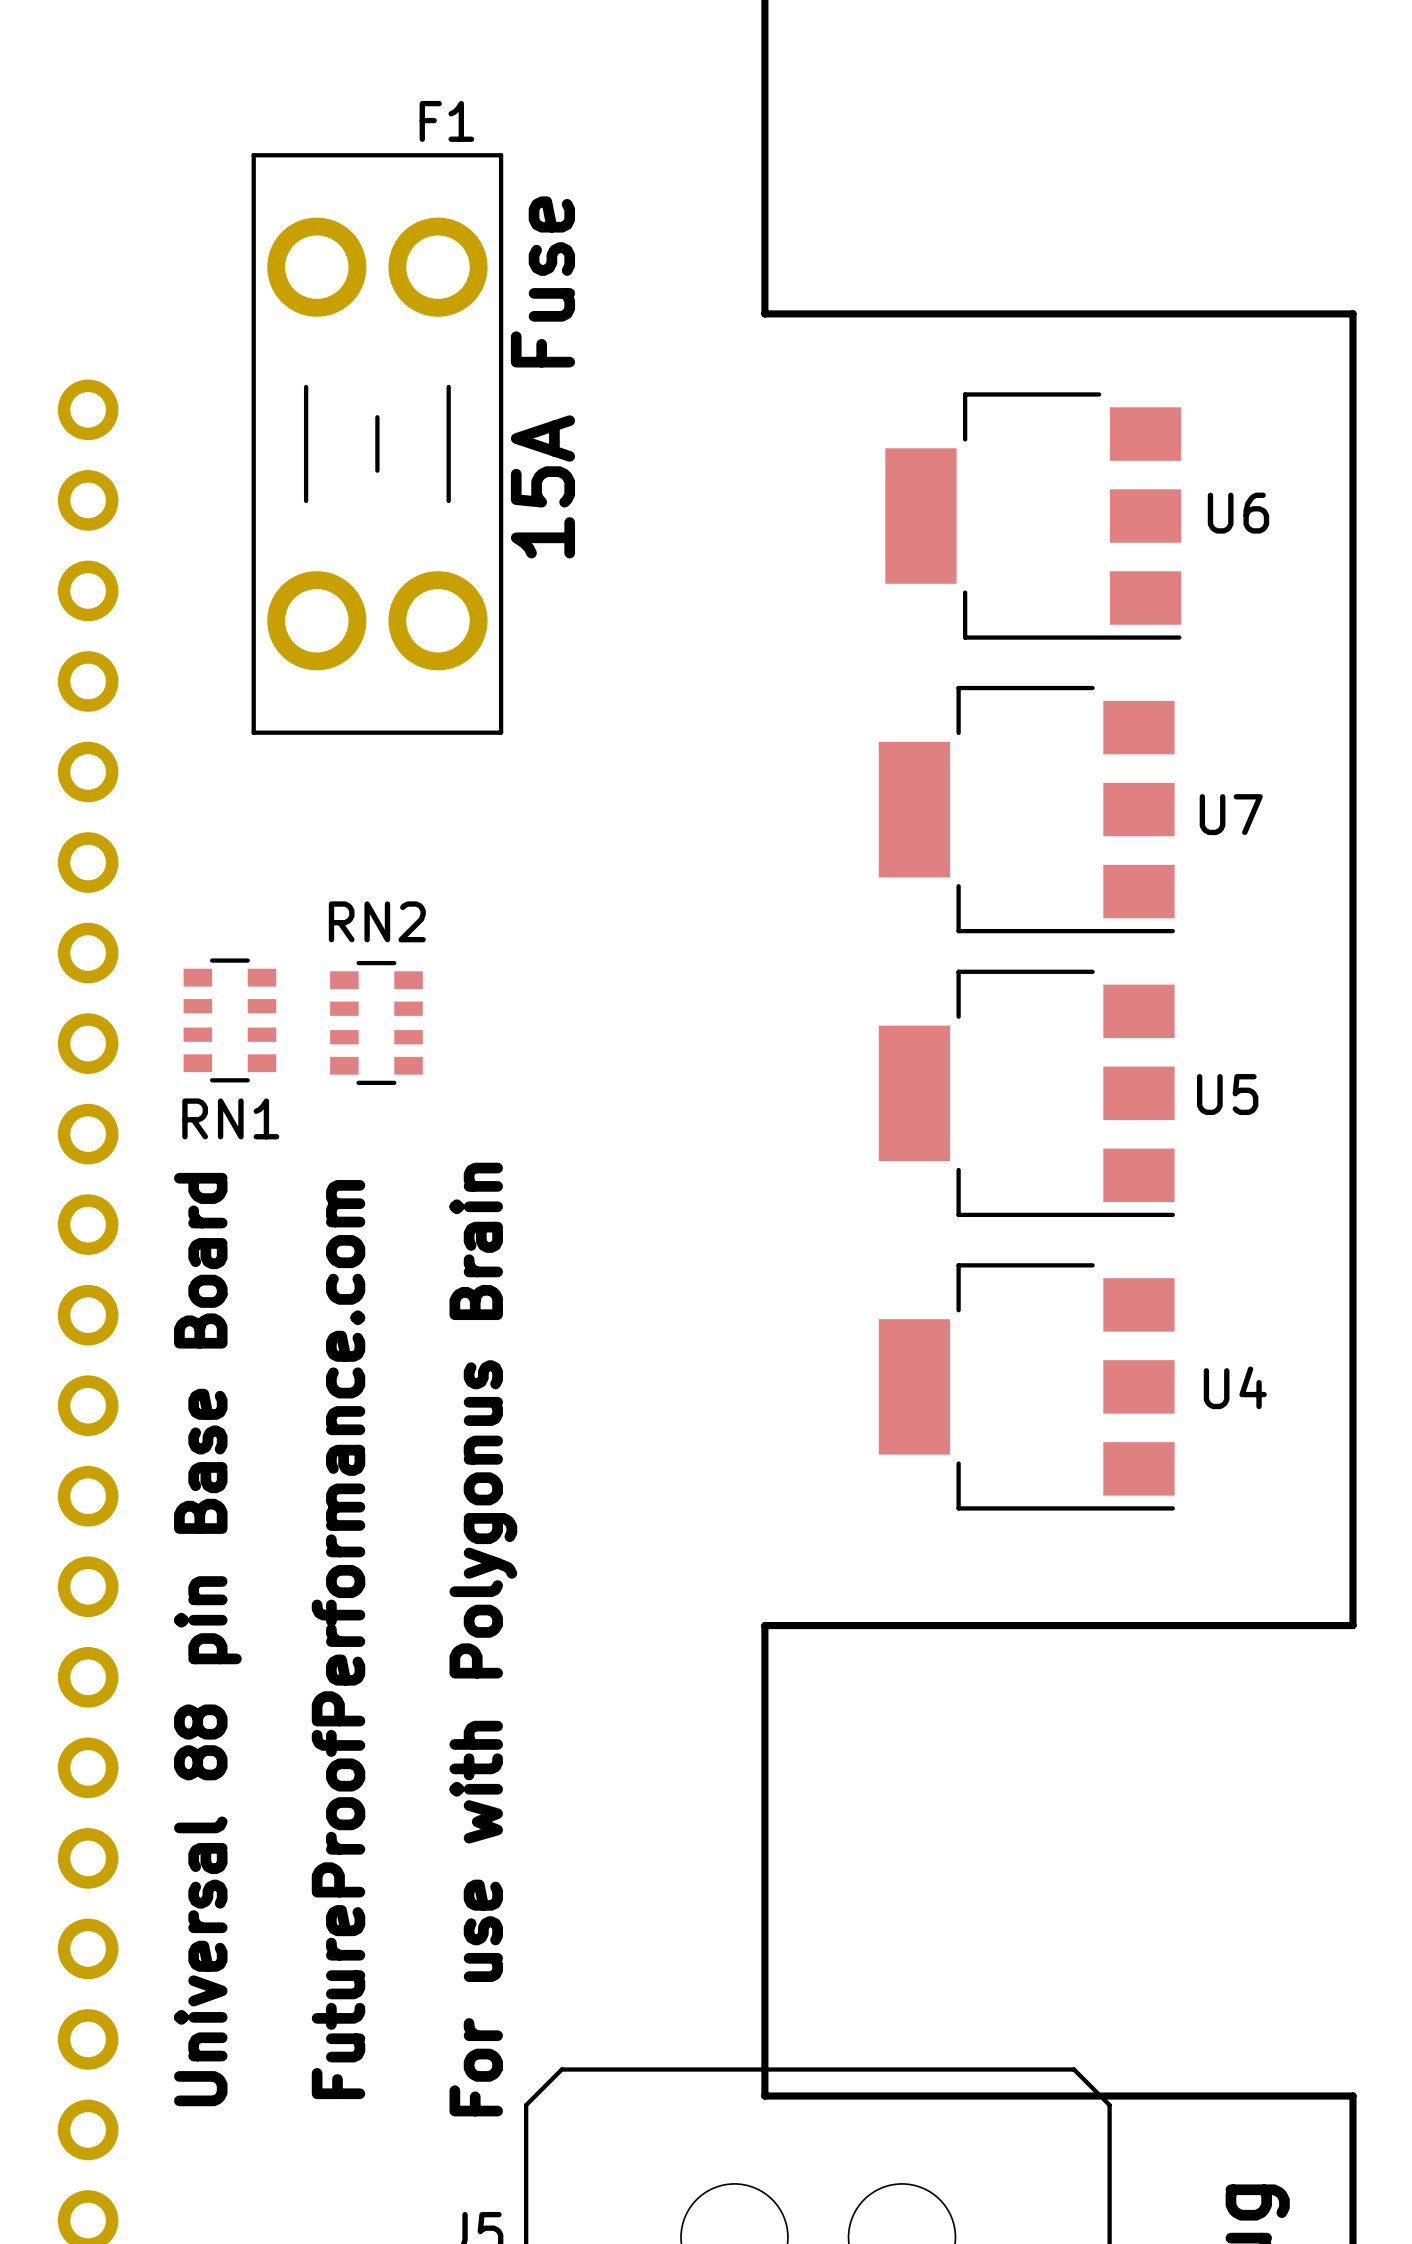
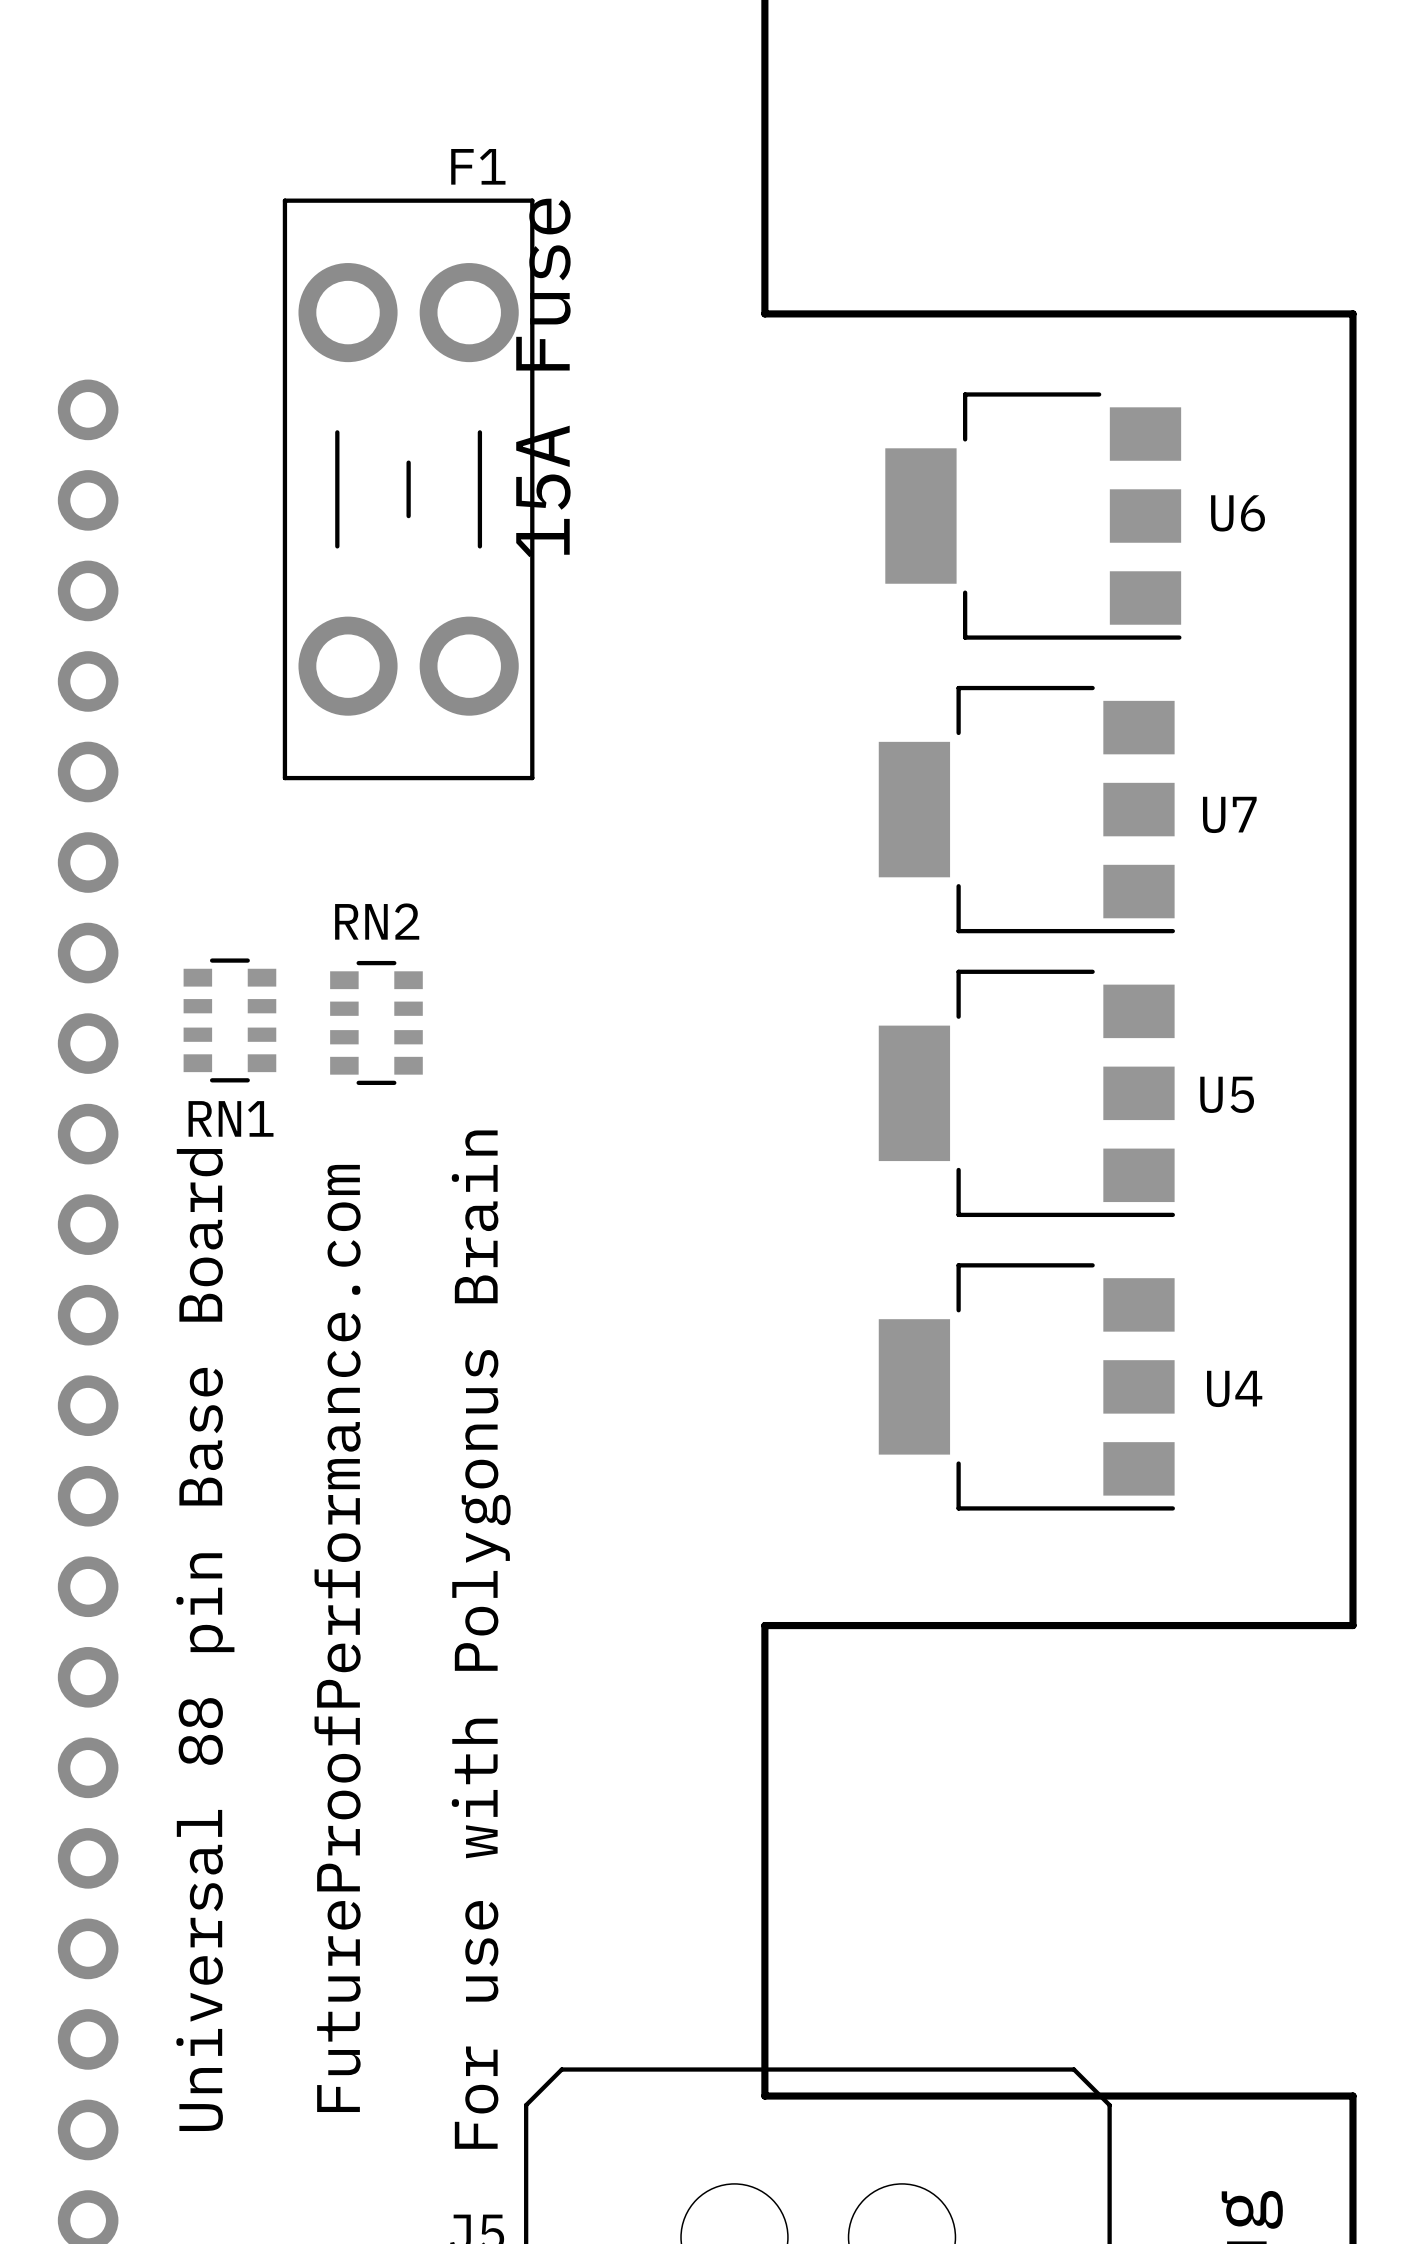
F1 position: (377, 443) -> (408, 489)

